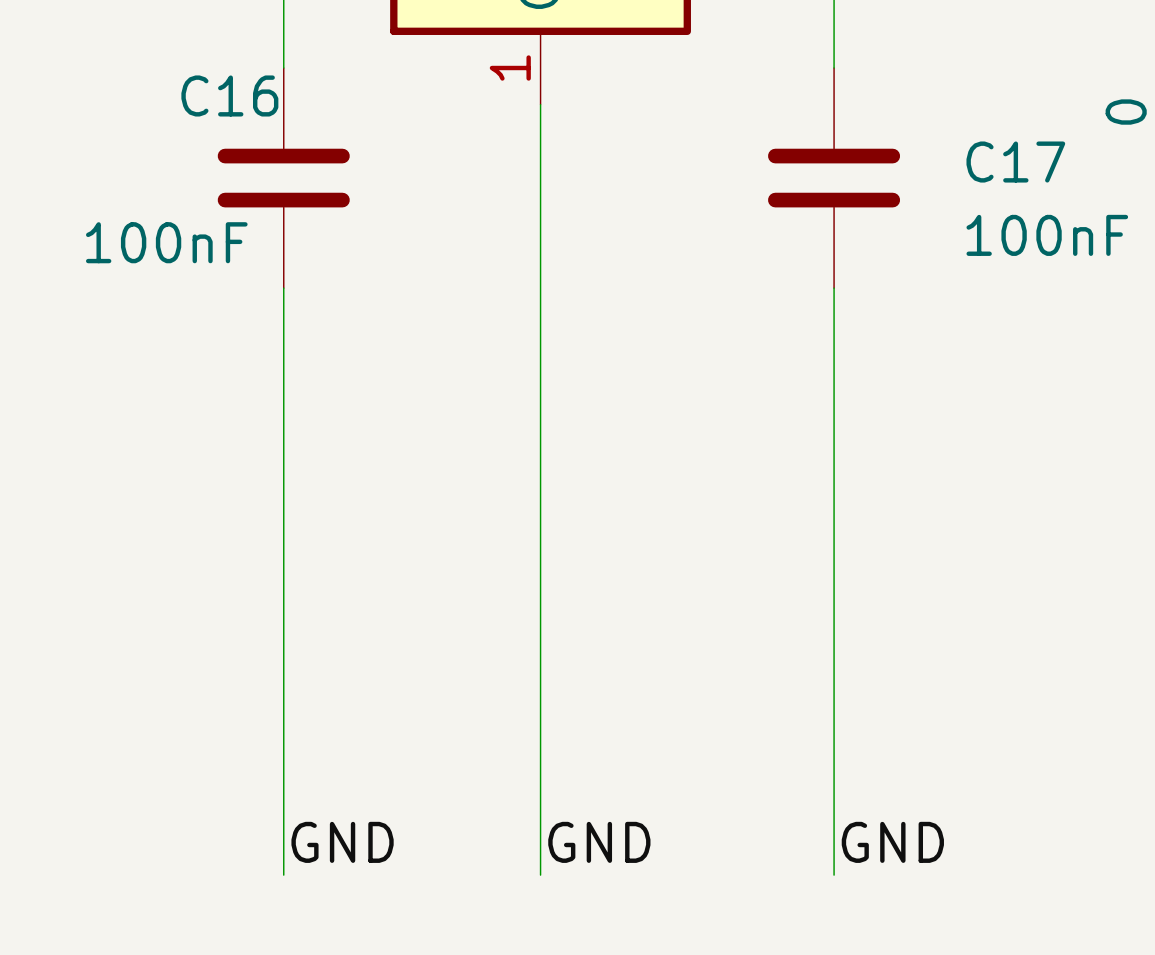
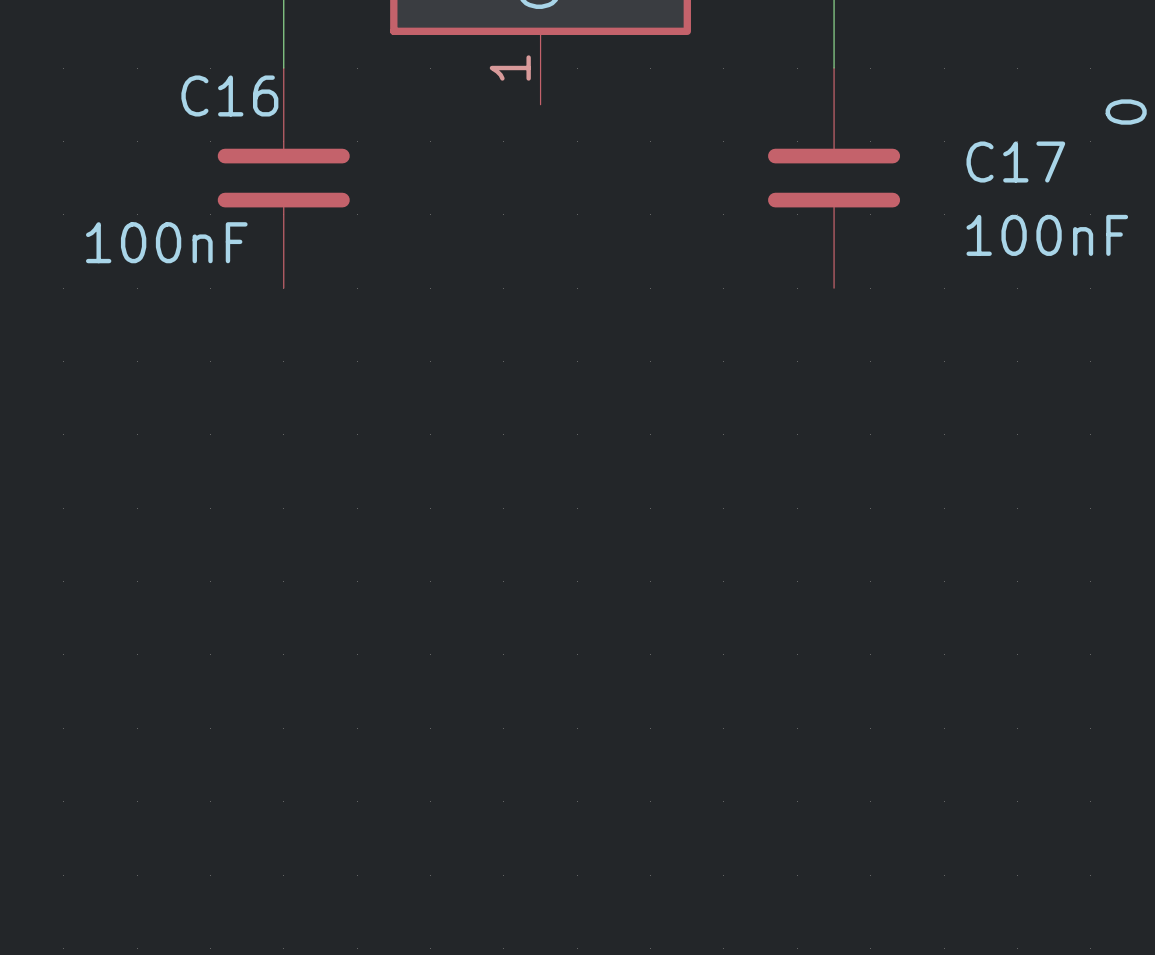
wire: (540, 104) (540, 875) -> none
wire: (283, 288) (283, 875) -> none
wire: (834, 288) (834, 875) -> none
label: GND (342, 842) -> none
label: GND (599, 842) -> none
label: GND (892, 842) -> none

